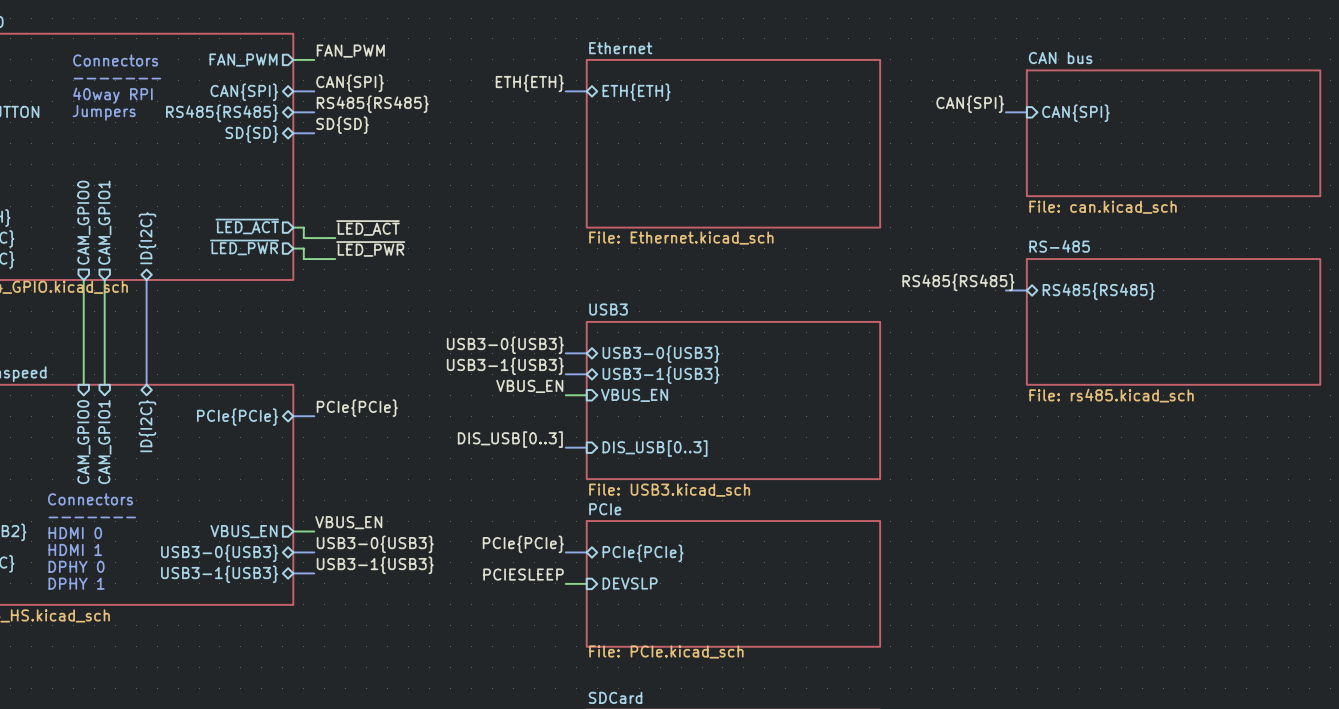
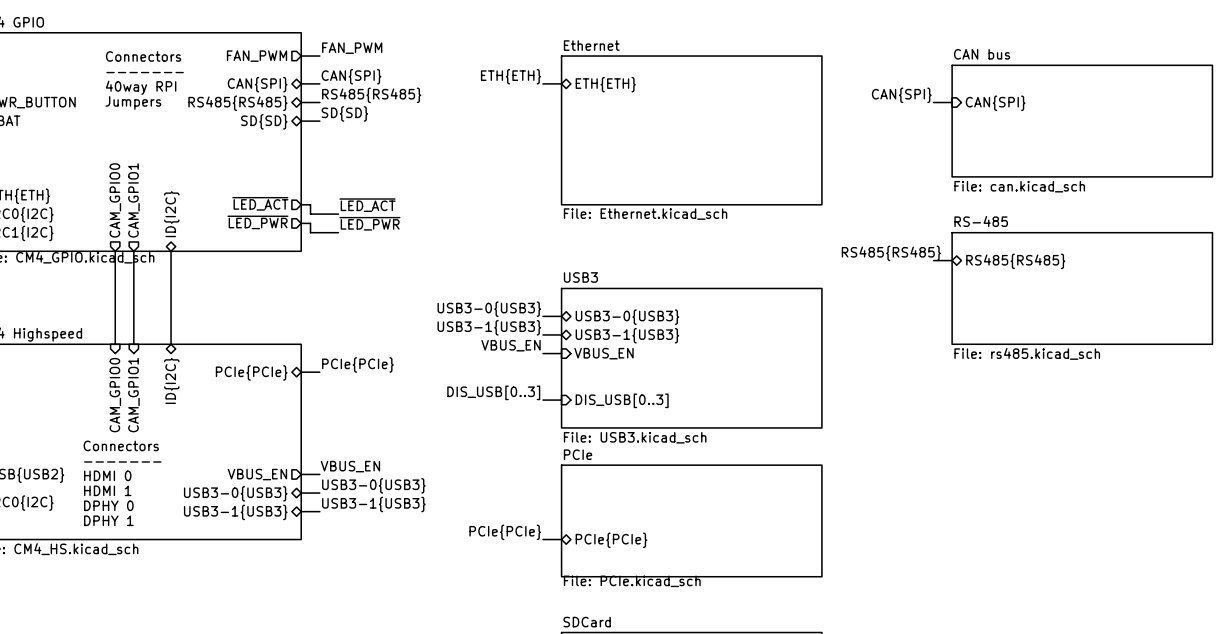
label position: PCIe{PCIe} (523, 544) -> PCIe{PCIe} (505, 532)
bus: (565, 552) (586, 552) -> (542, 539) (561, 539)
sheet pin position: PCIe{PCIe} (643, 553) -> PCIe{PCIe} (611, 540)
label: PCIESLEEP (523, 574) -> none
wire: (565, 583) (586, 583) -> none
sheet pin: DEVSLP (630, 583) -> none

